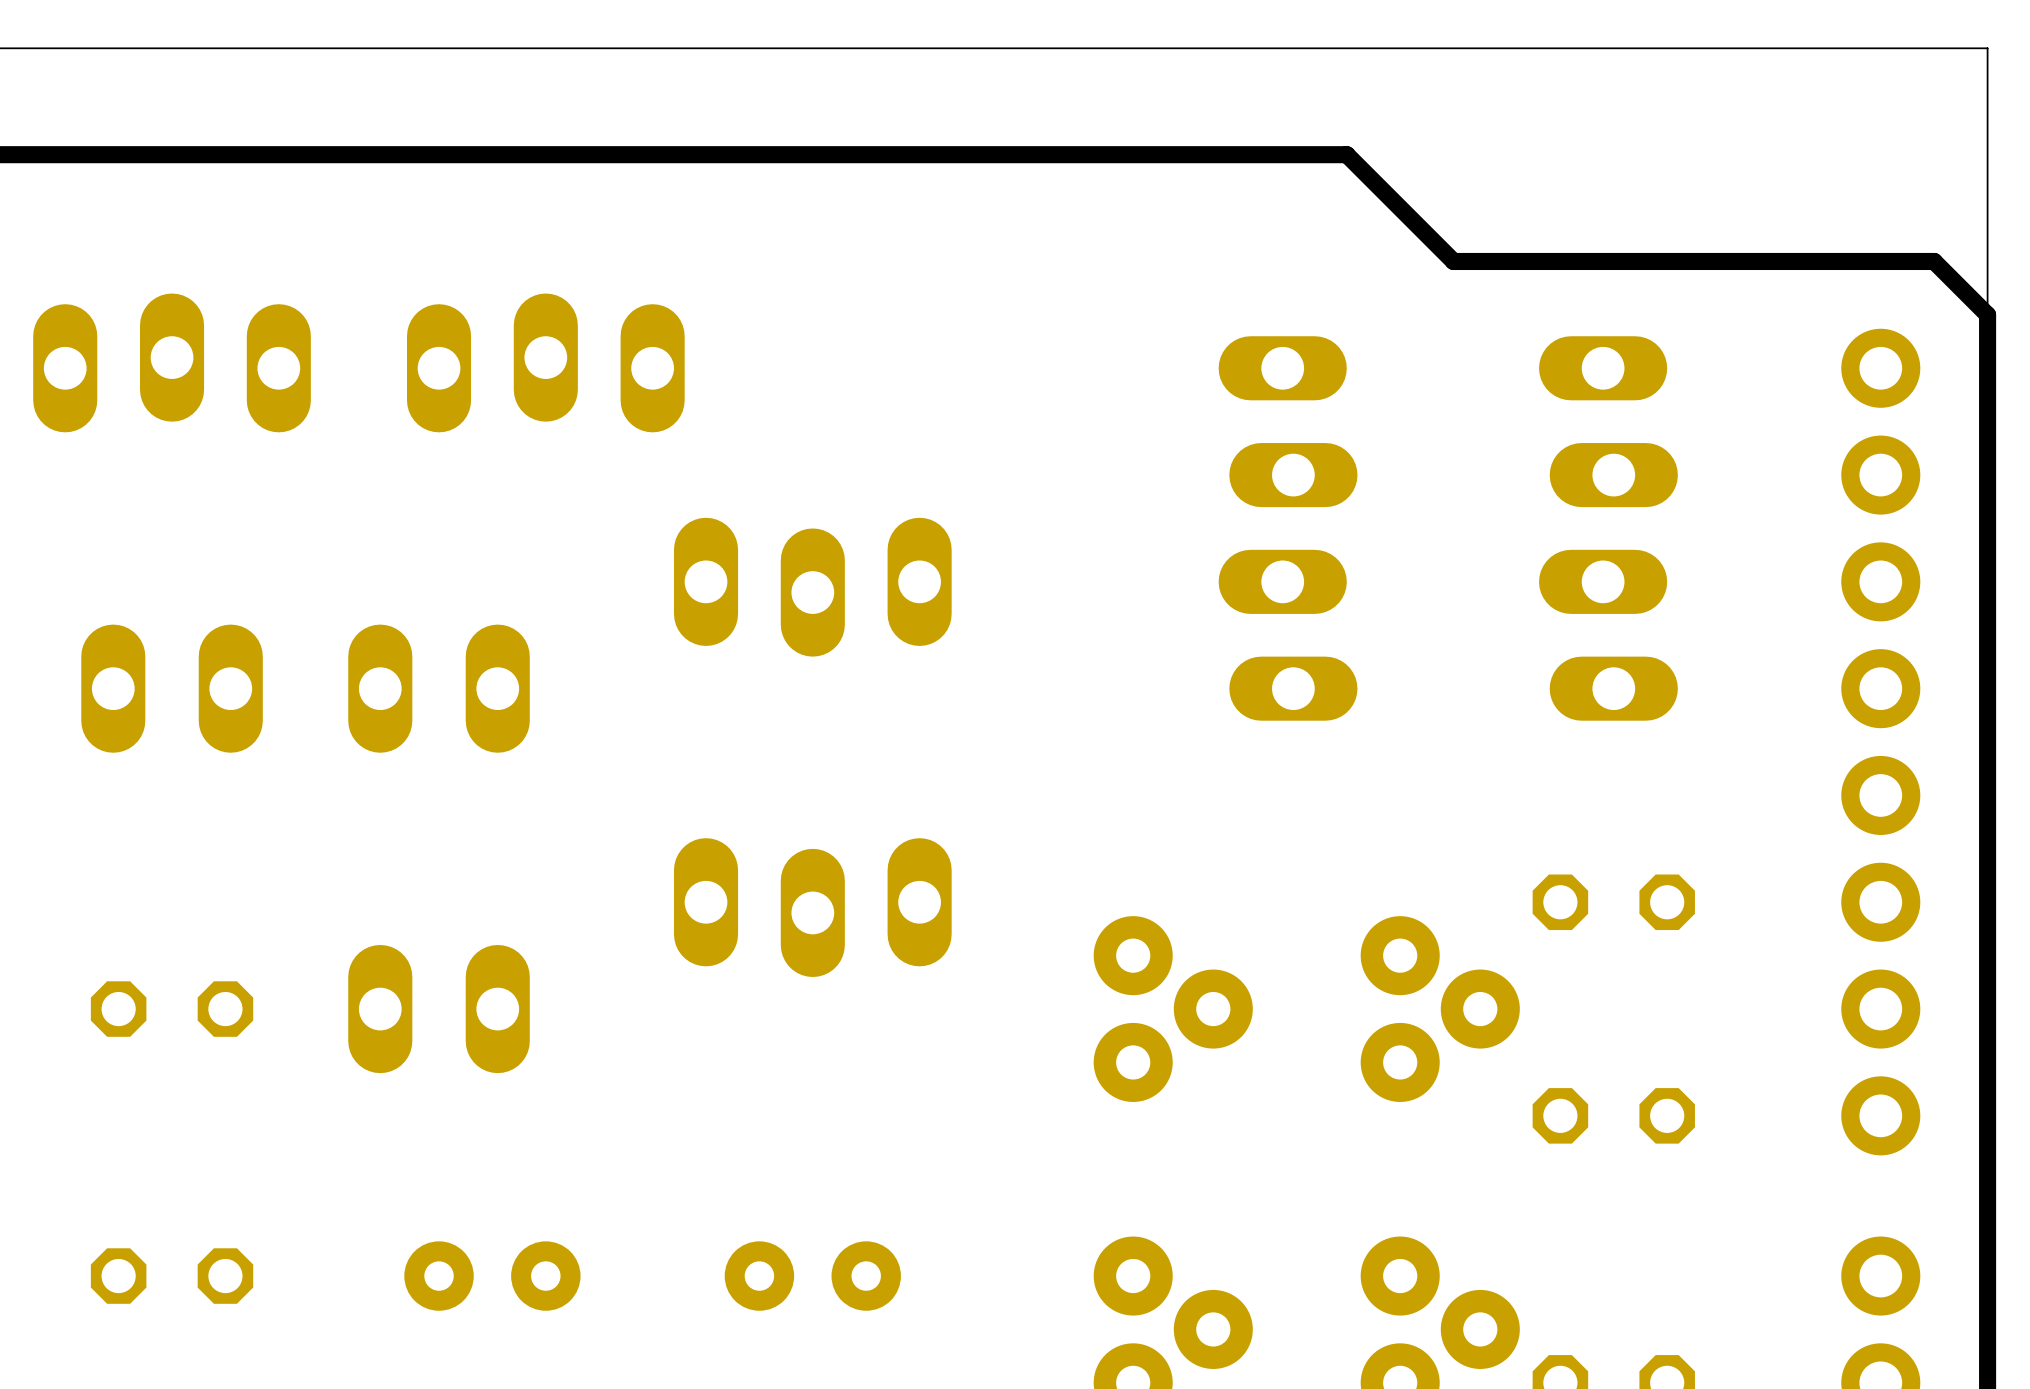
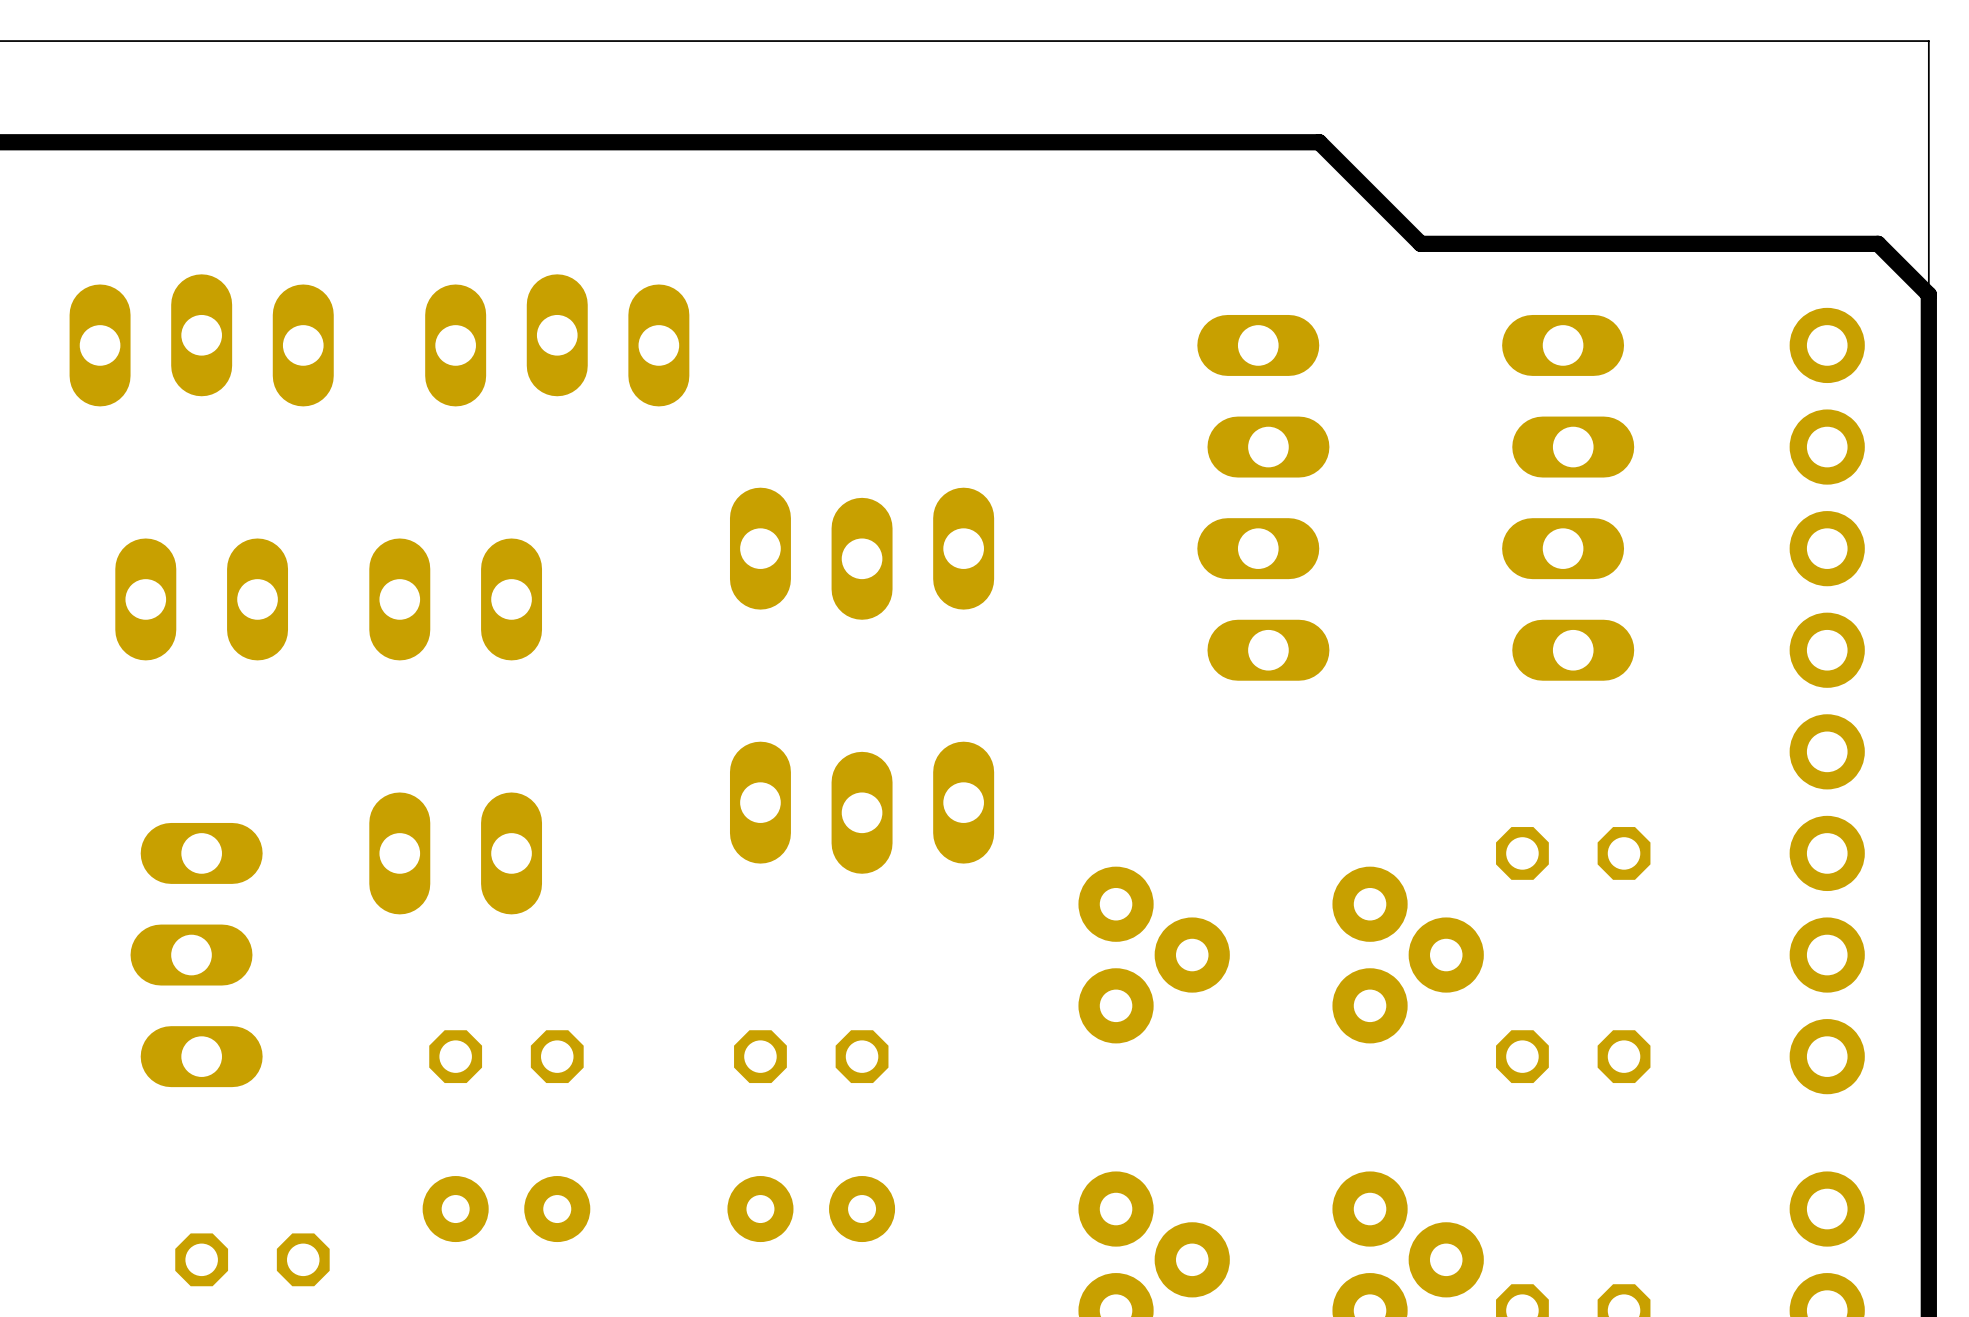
part position: (812, 587) -> (862, 553)
part position: (172, 688) -> (201, 599)
part position: (439, 688) -> (455, 599)
part: none -> (455, 853)
part position: (812, 907) -> (862, 807)
part footprint: [90, 981, 254, 1037] -> [130, 822, 263, 1088]
part: (439, 1009) -> none
part: none -> (506, 1056)
part: none -> (811, 1056)
part position: (172, 1276) -> (252, 1259)

